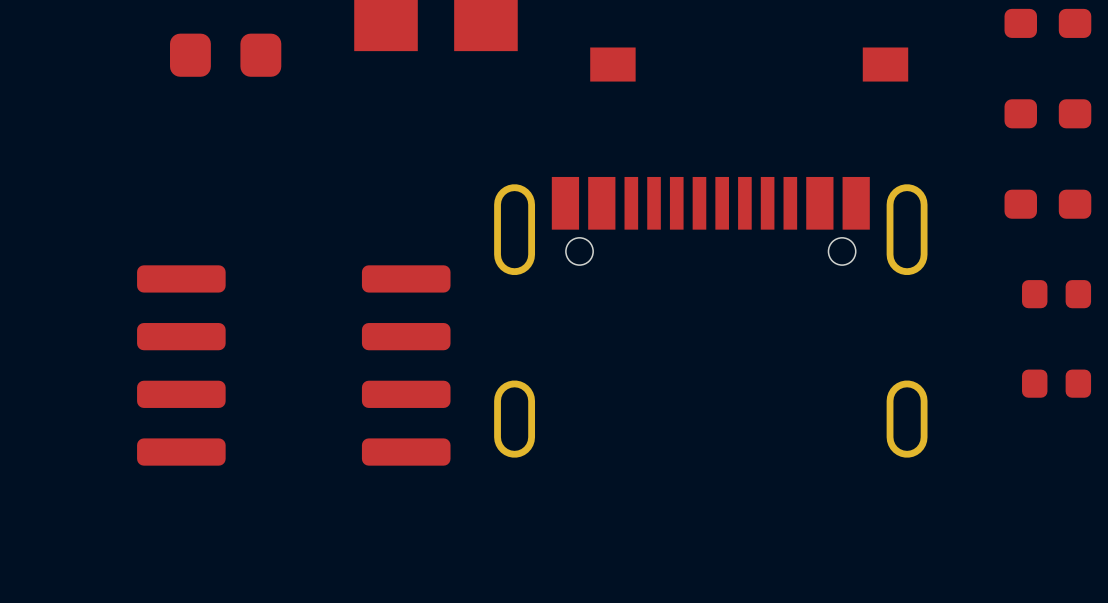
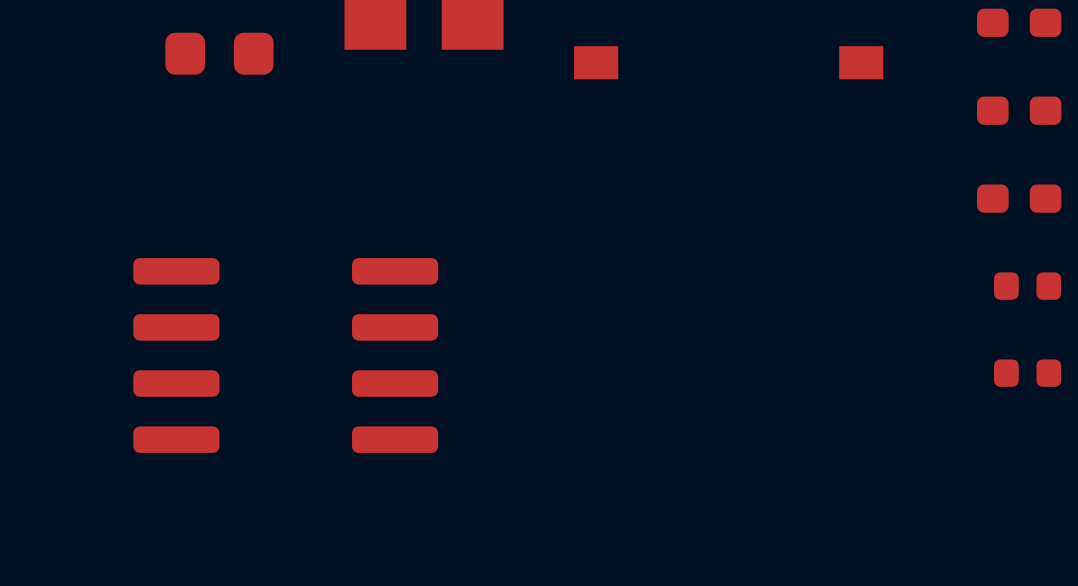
part: (710, 317) -> none

